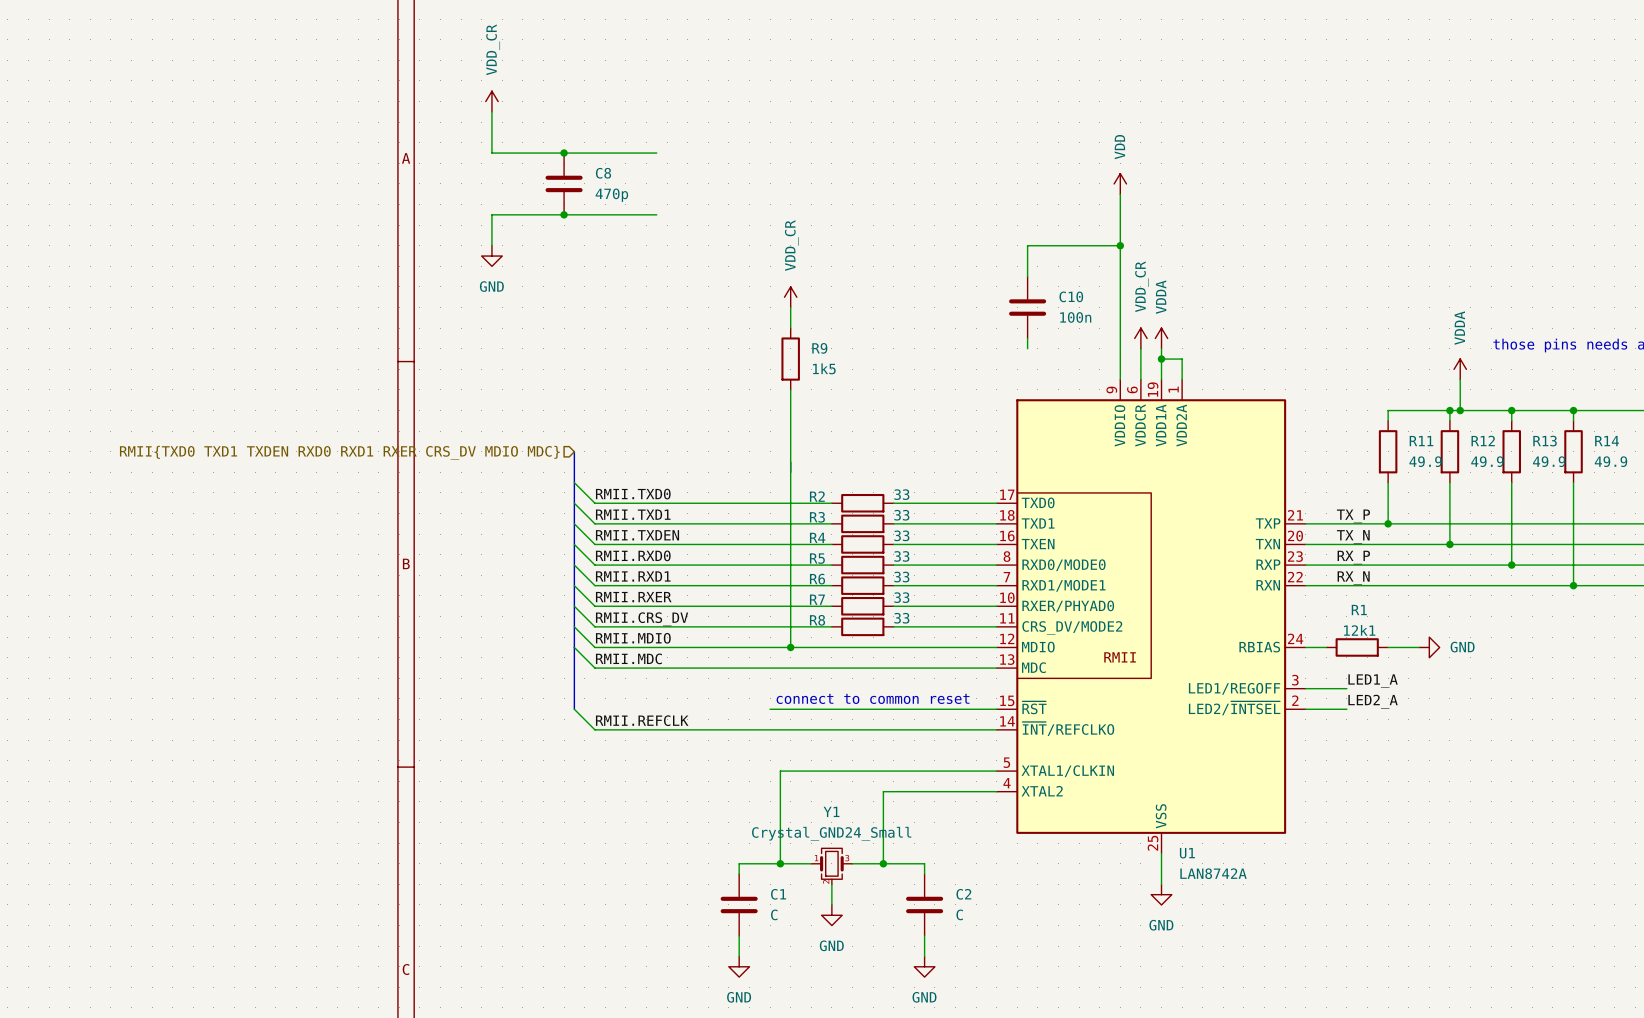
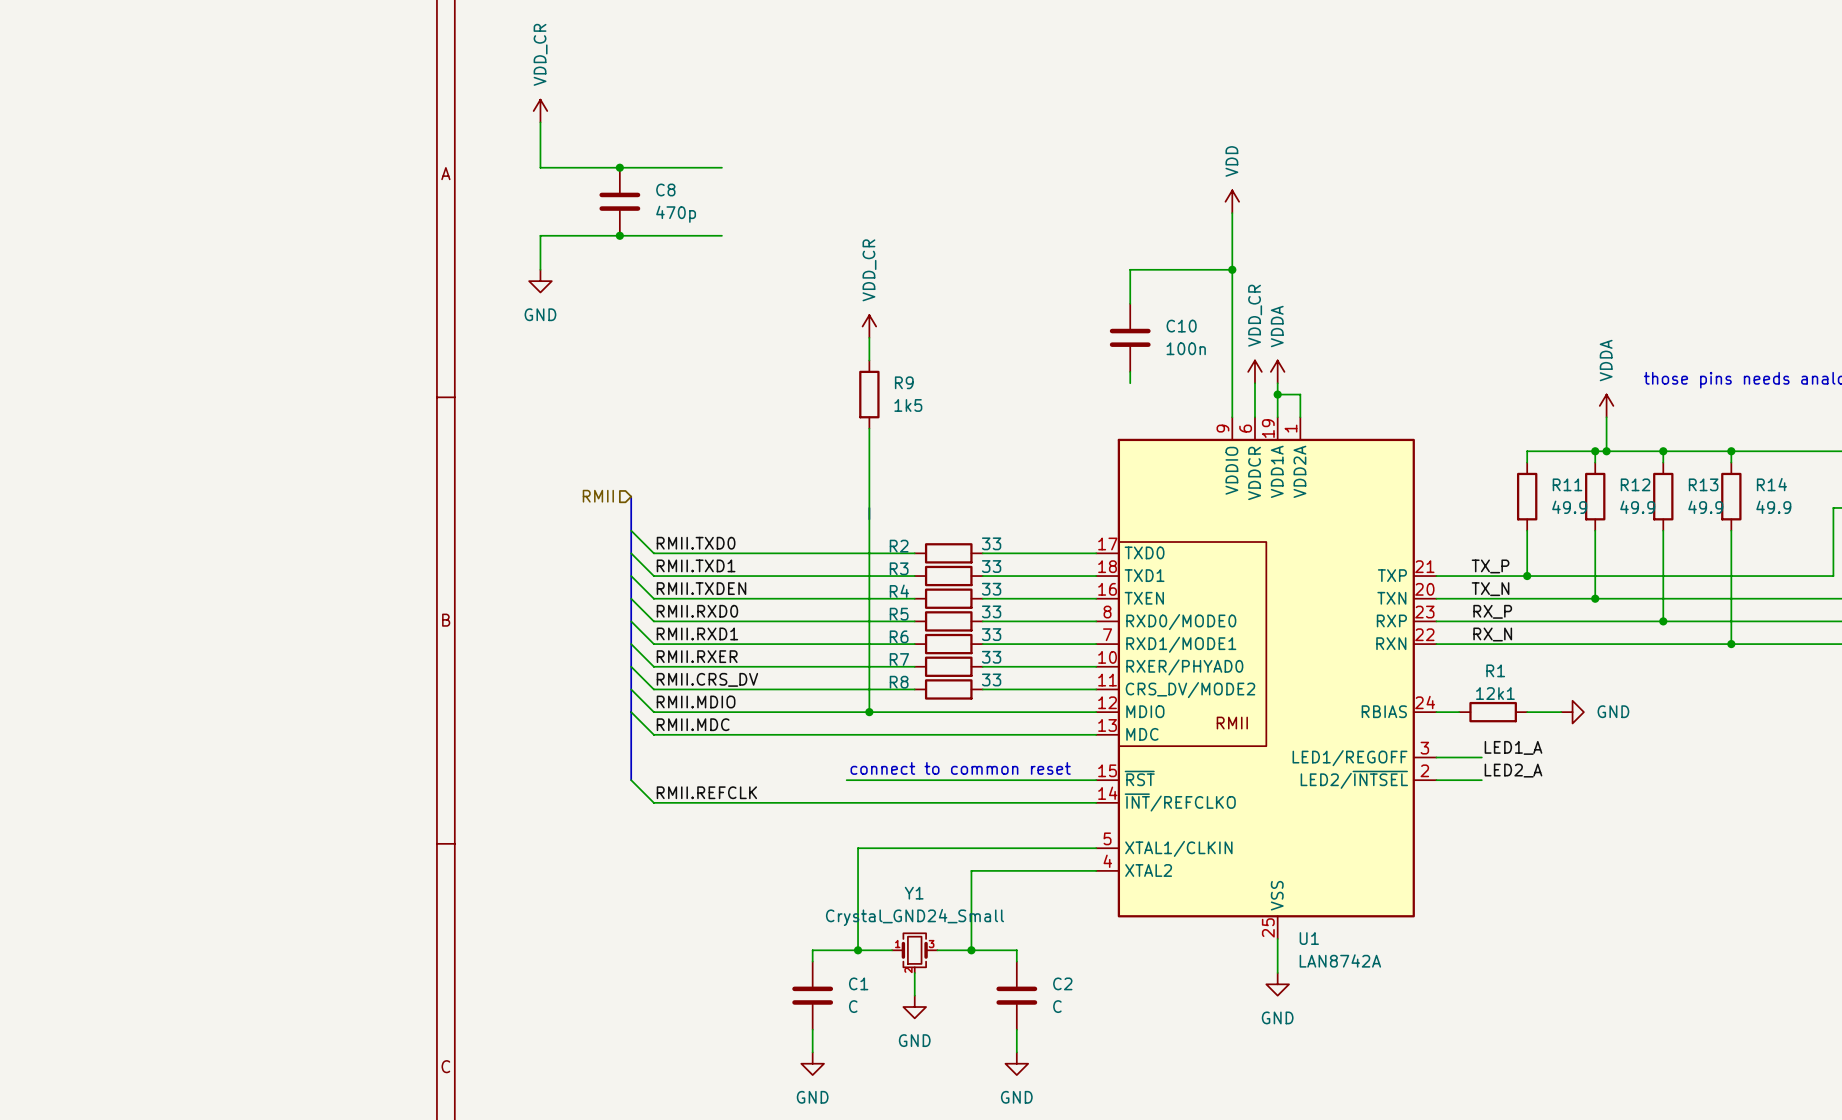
hierarchical label: RMII{TXD0 TXD1 TXDEN RXD0 RXD1 RXER CRS_DV MDIO MDC} (339, 452) -> RMII (598, 496)

